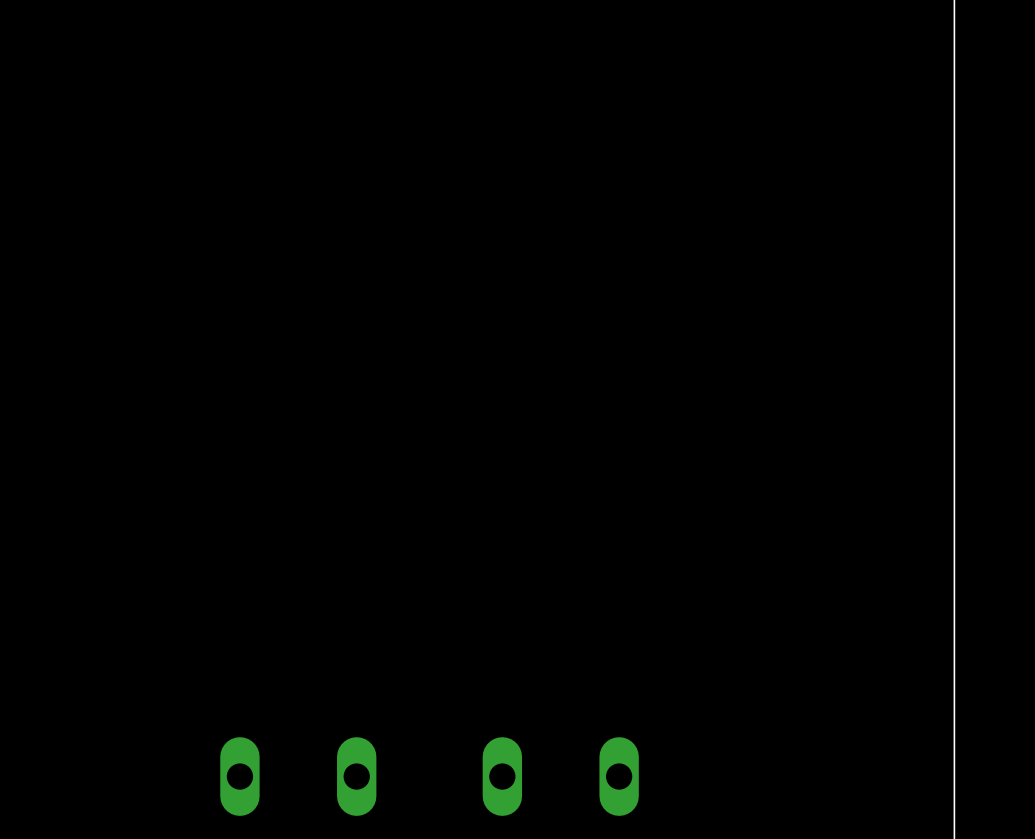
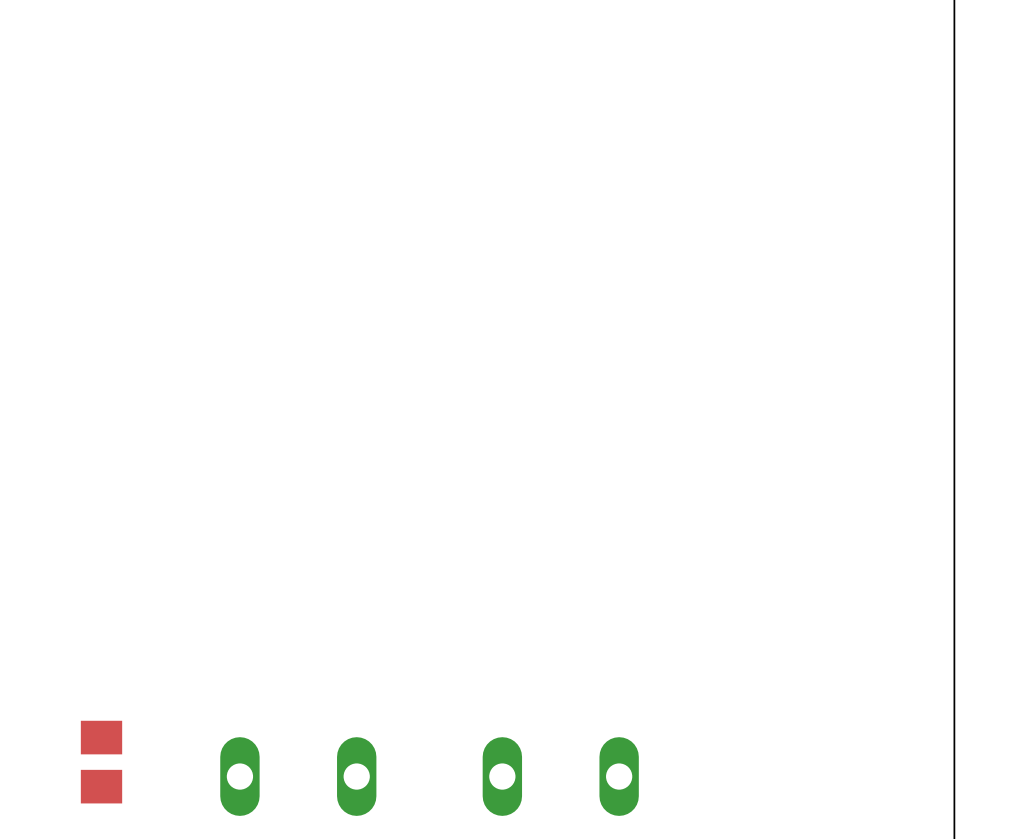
part: none -> (101, 762)

